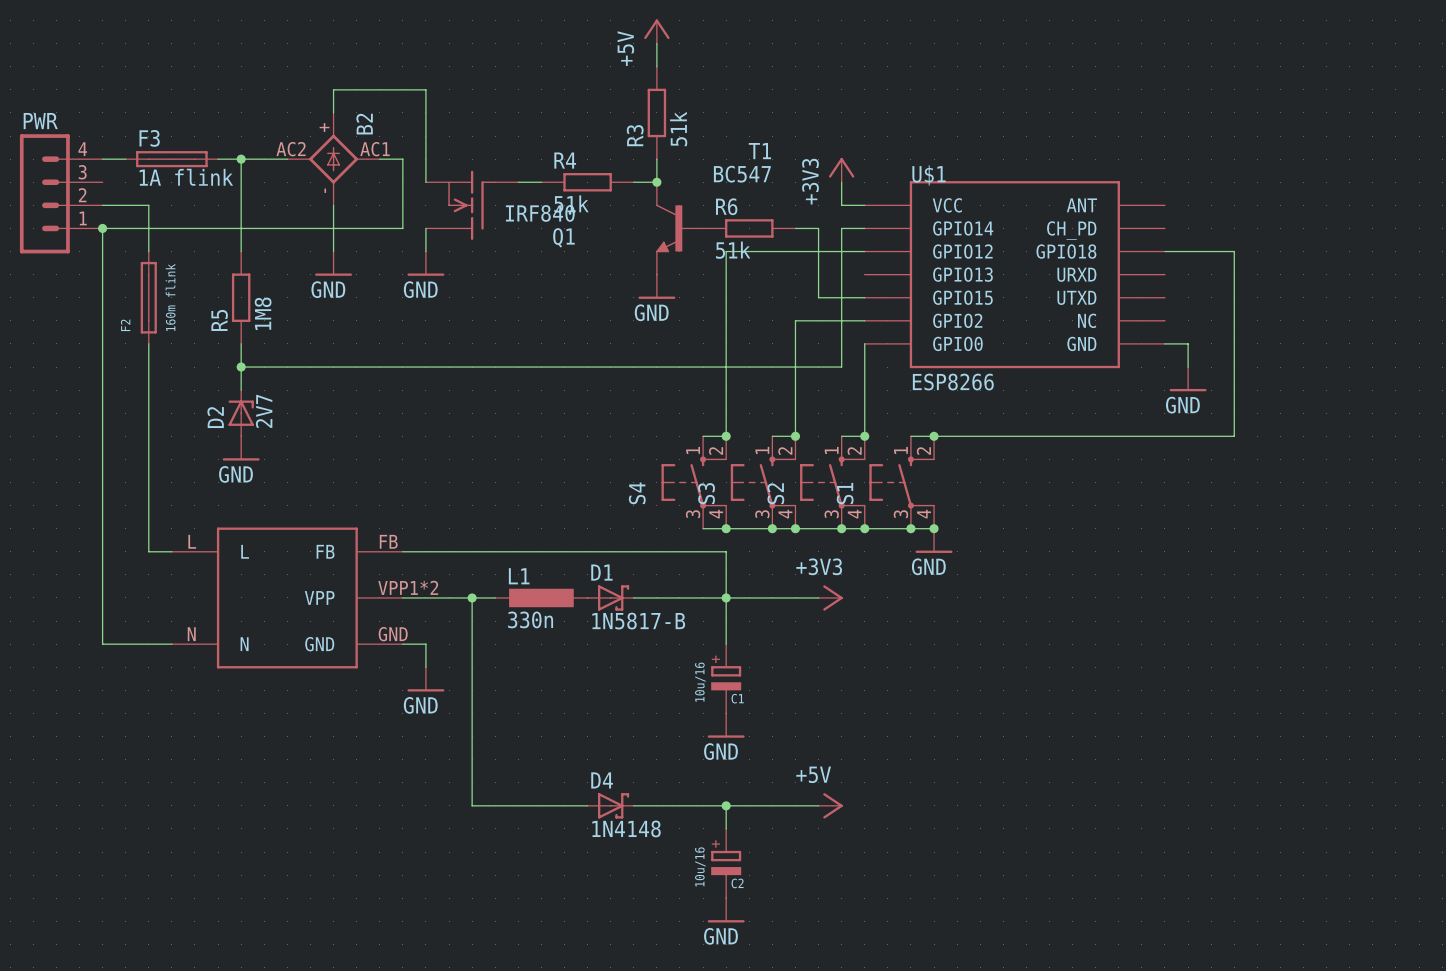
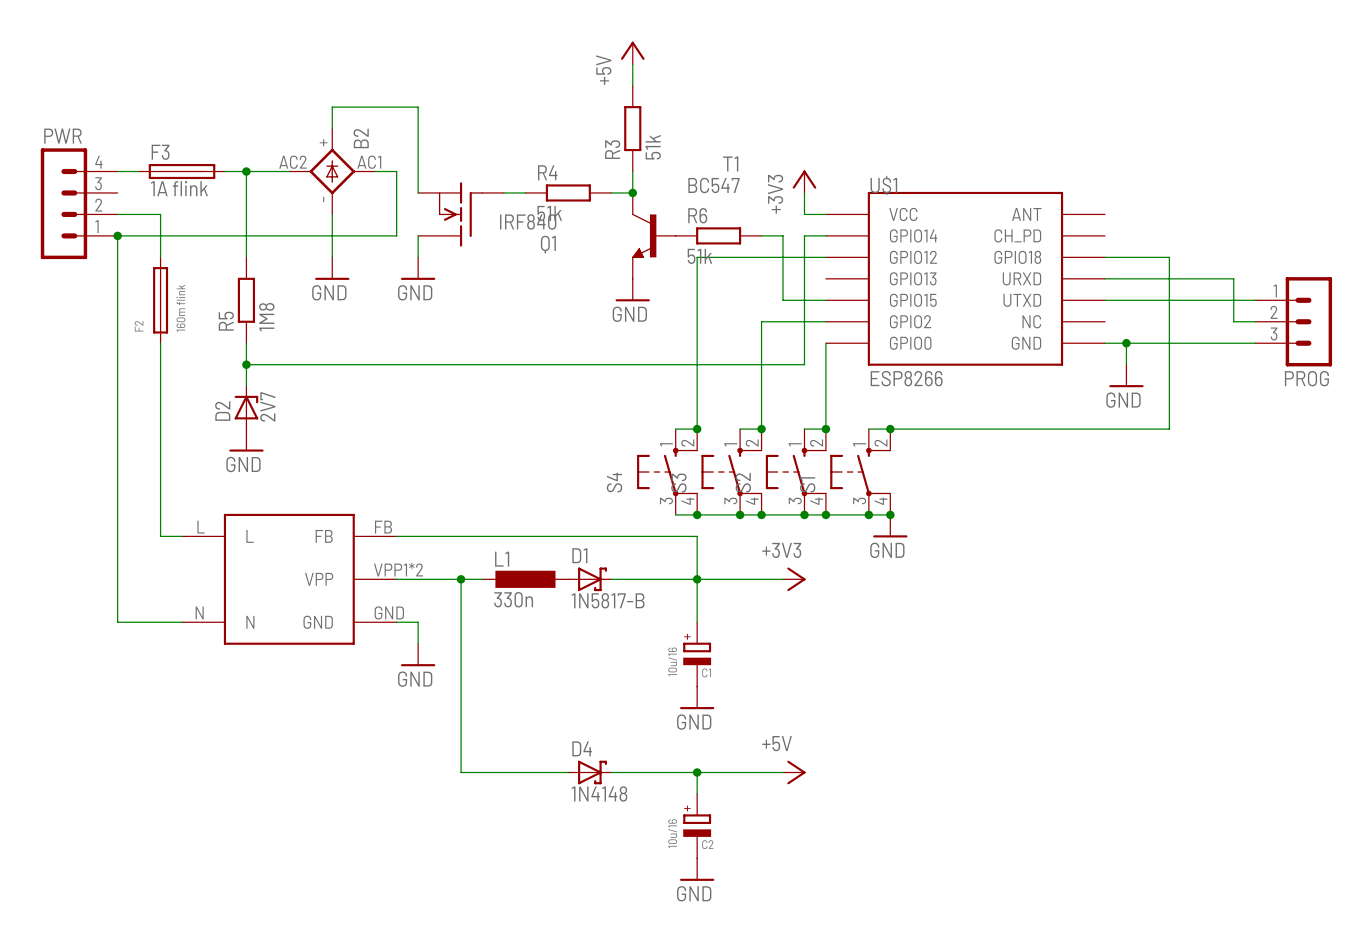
wire: none -> (1104, 278) (1233, 278) (1233, 321) (1255, 321)
wire: none -> (1104, 300) (1255, 300)
PROG: none -> (1293, 321)
wire: none -> (1126, 343) (1255, 343)
junction: none -> (1126, 343)

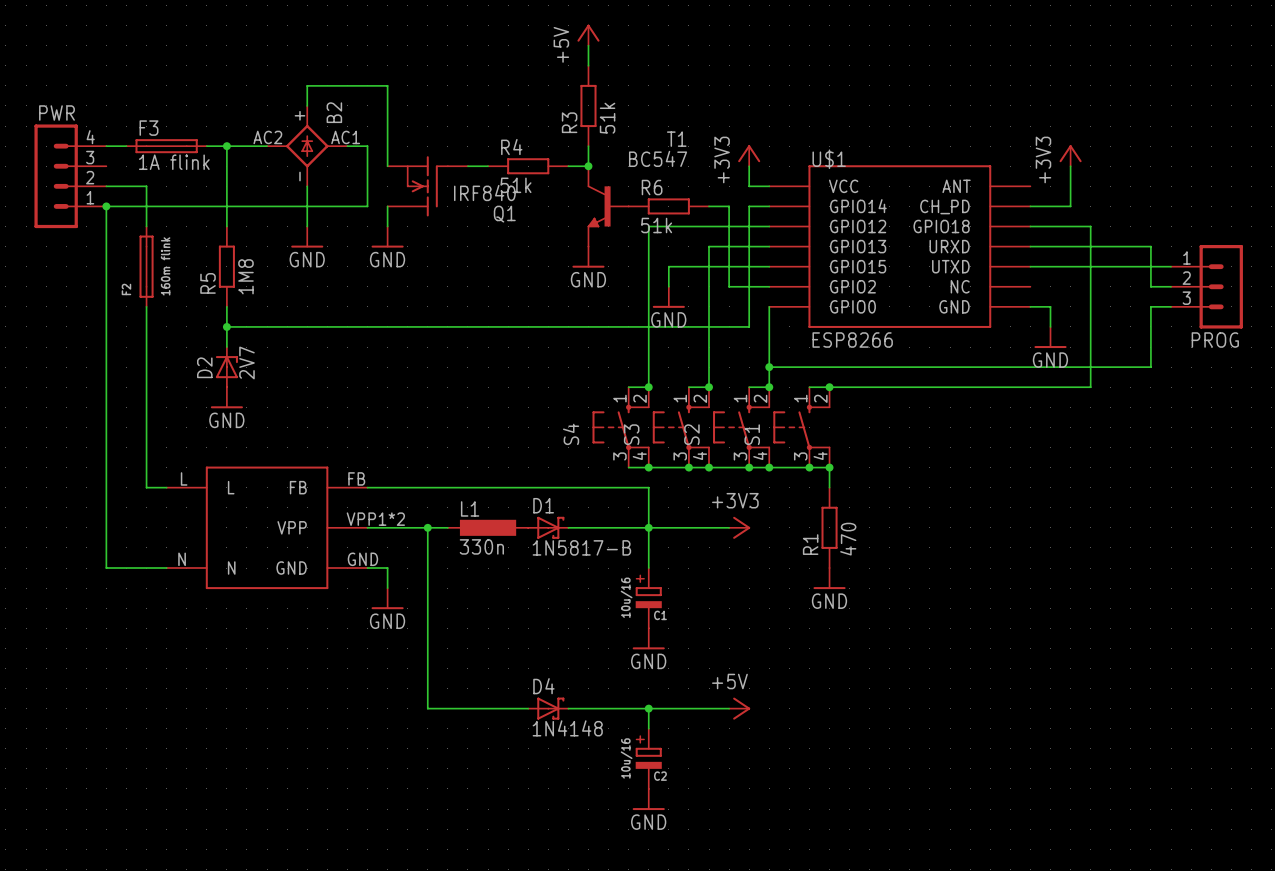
power symbol: none -> +3V3 (1070, 155)
wire: none -> (1070, 166) (1070, 206) (1030, 206)
wire: none -> (769, 246) (709, 246) (709, 286)
wire: (761, 321) (783, 321) -> (668, 286) (668, 266) (729, 266) (729, 286)
power symbol: none -> GND (668, 297)
wire: (1126, 343) (1233, 343) -> (769, 367) (1150, 367) (1150, 306)
junction: (1126, 343) -> none
junction: none -> (769, 367)
power symbol position: GND (890, 526) -> GND (829, 578)
R1: none -> 470 (829, 527)

